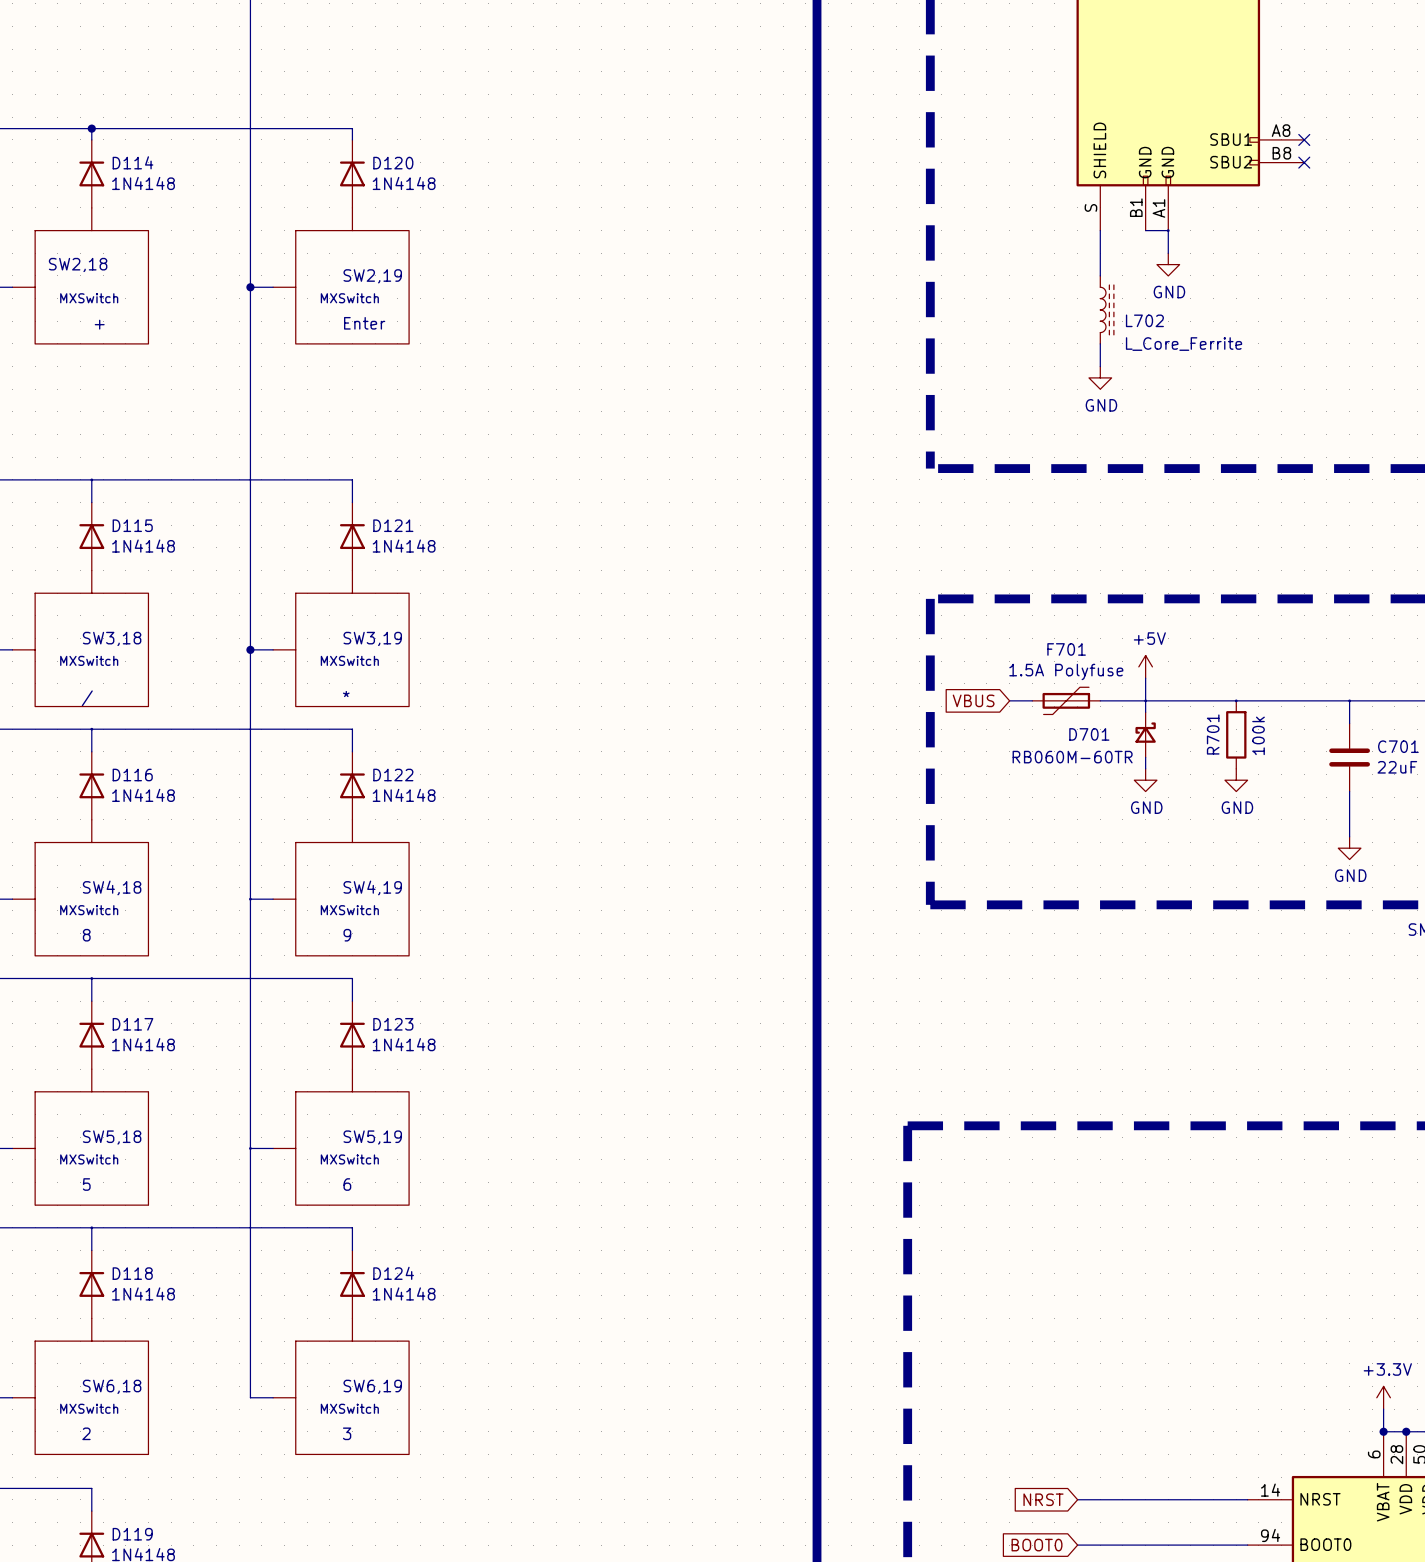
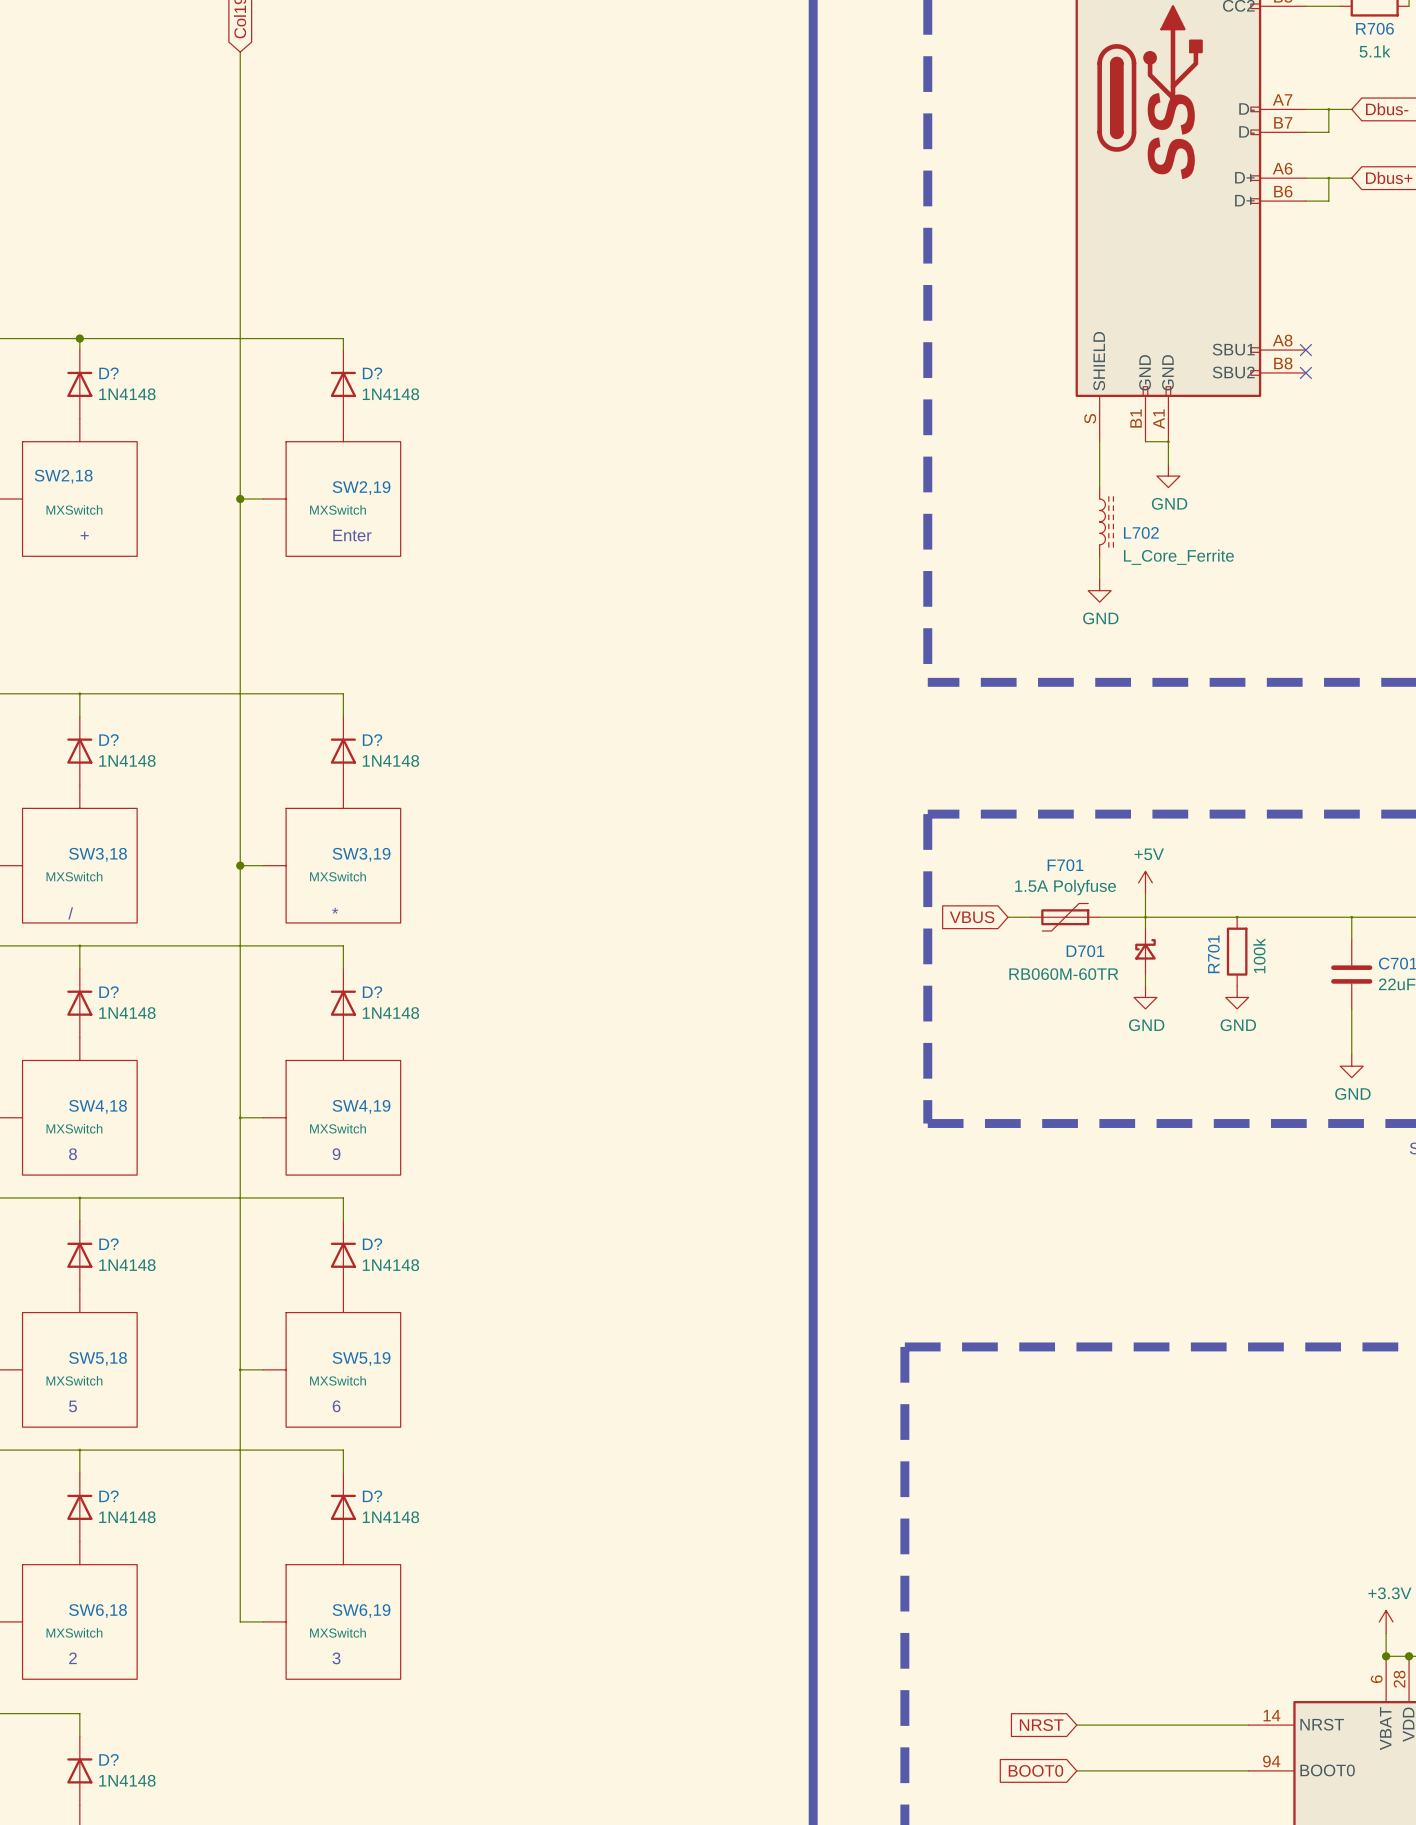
D114 name: D114 (132, 162) -> D? (108, 373)
D120 name: D120 (393, 163) -> D? (372, 373)
D115 name: D115 (132, 525) -> D? (108, 740)
D121 name: D121 (393, 525) -> D? (372, 740)
D116 name: D116 (132, 775) -> D? (108, 992)
D122 name: D122 (393, 775) -> D? (372, 992)
D117 name: D117 (132, 1024) -> D? (108, 1244)
D123 name: D123 (393, 1024) -> D? (372, 1244)
D118 name: D118 (132, 1273) -> D? (108, 1496)
D124 name: D124 (393, 1273) -> D? (372, 1496)
D119 name: D119 (132, 1534) -> D? (108, 1759)

